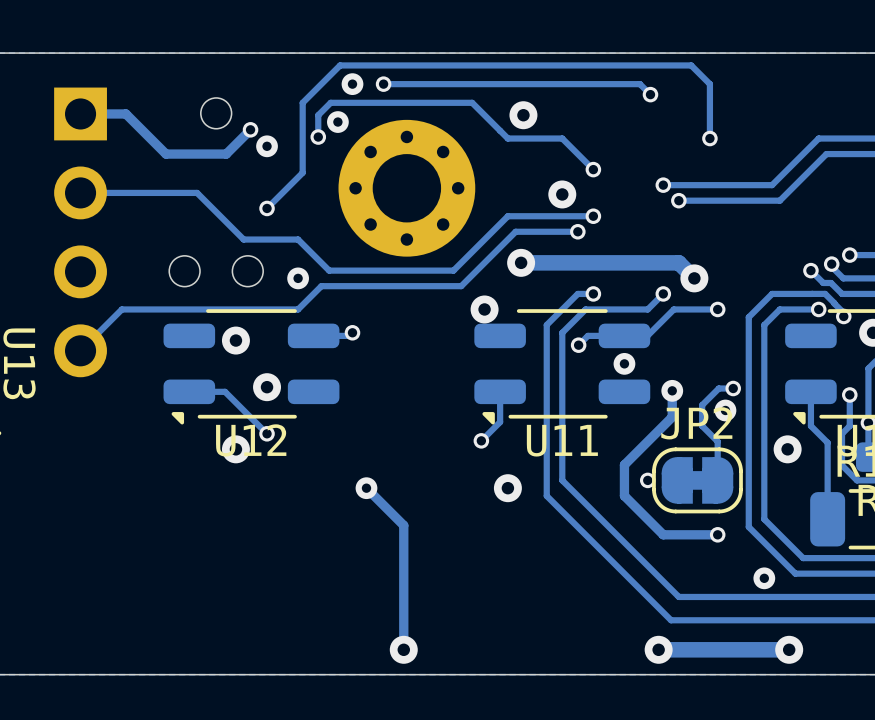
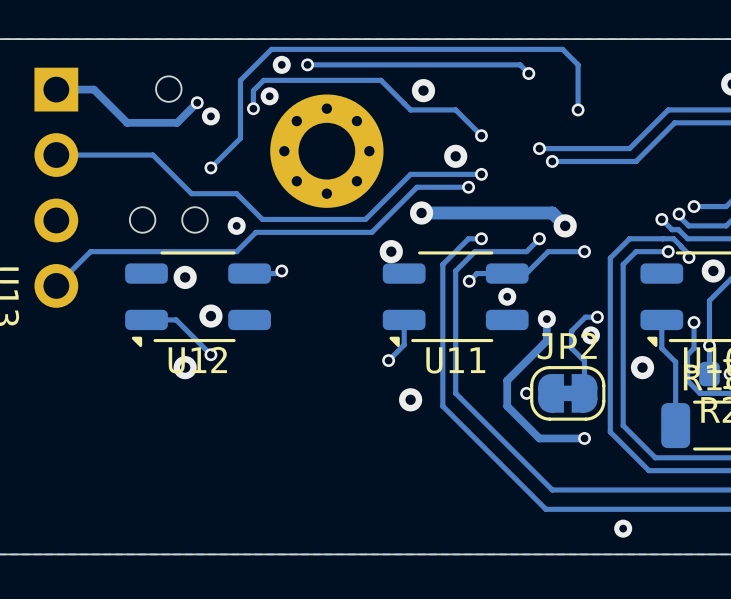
track: (366, 488) (403, 525) (403, 649) -> none
via: (366, 488) -> none
via position: (764, 578) -> (623, 528)
via: (403, 649) -> none
via: (658, 649) -> none
track: (789, 649) (658, 649) -> none
via: (789, 649) -> none

